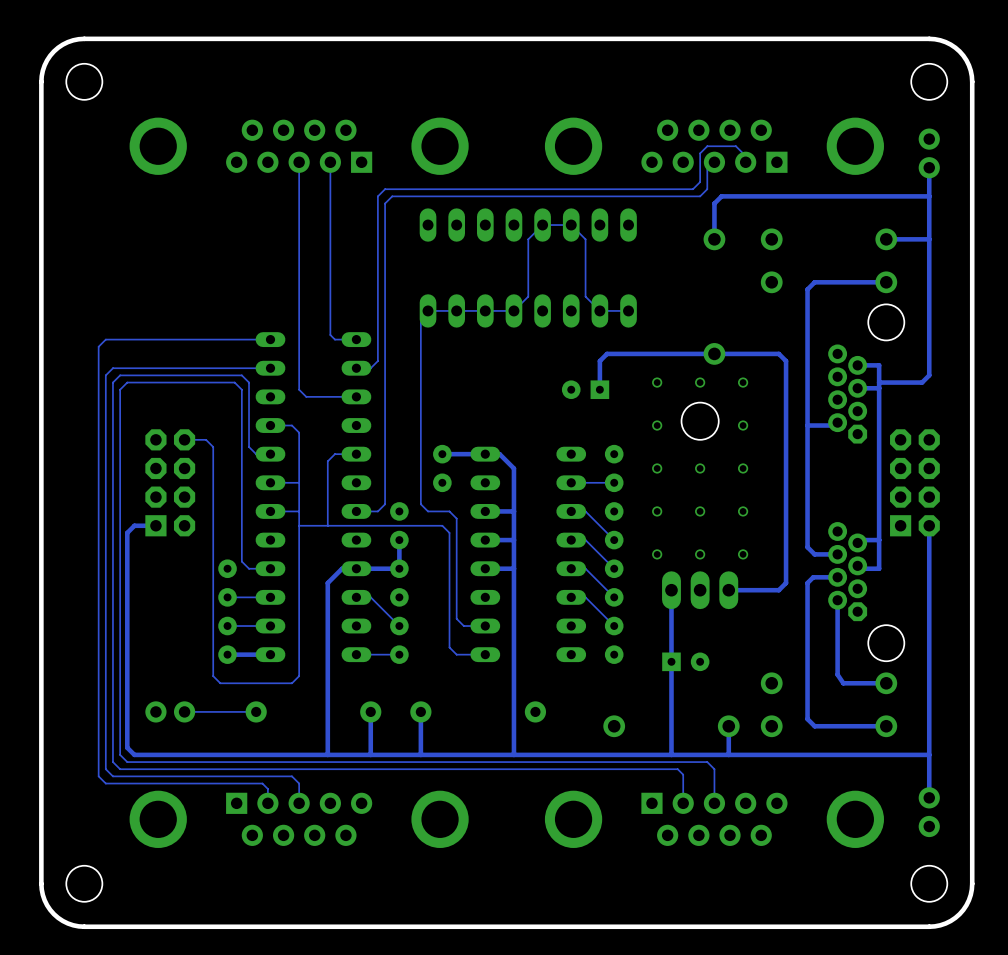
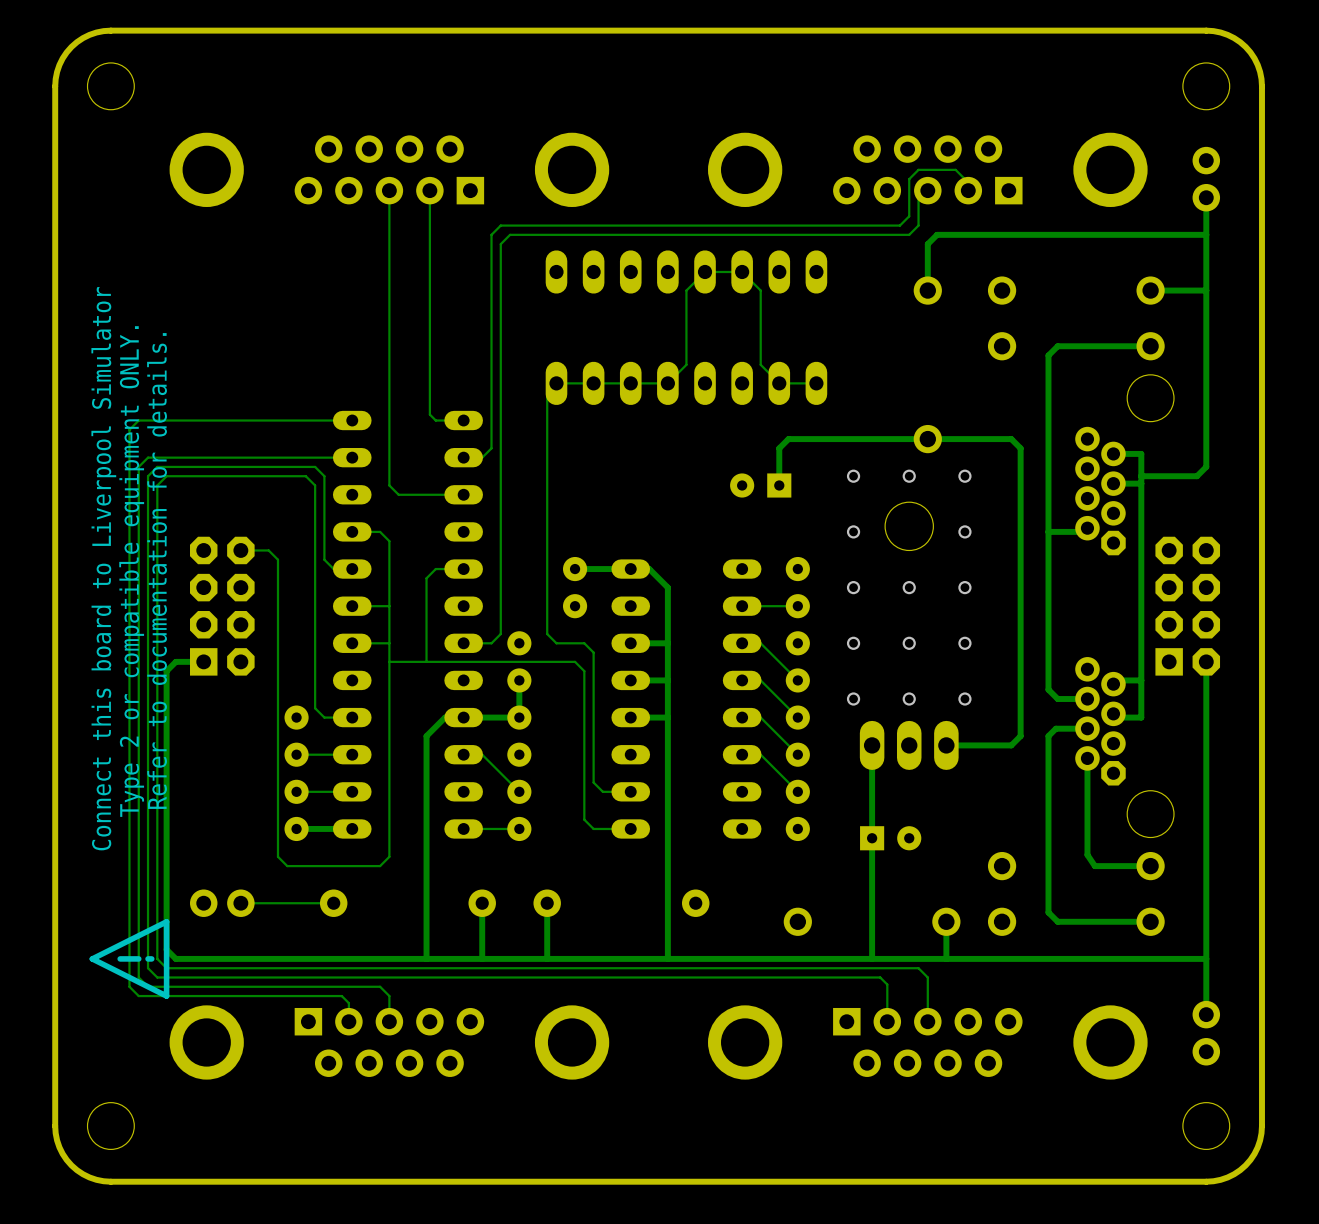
text: none -> Connect this board to Liverpool Simulator (103, 568)
text: none -> Refer to documentation for details. (157, 570)
text: none -> Type 2 or compatible equipment ONLY. (131, 571)
drawing: none -> [89, 919, 170, 999]

